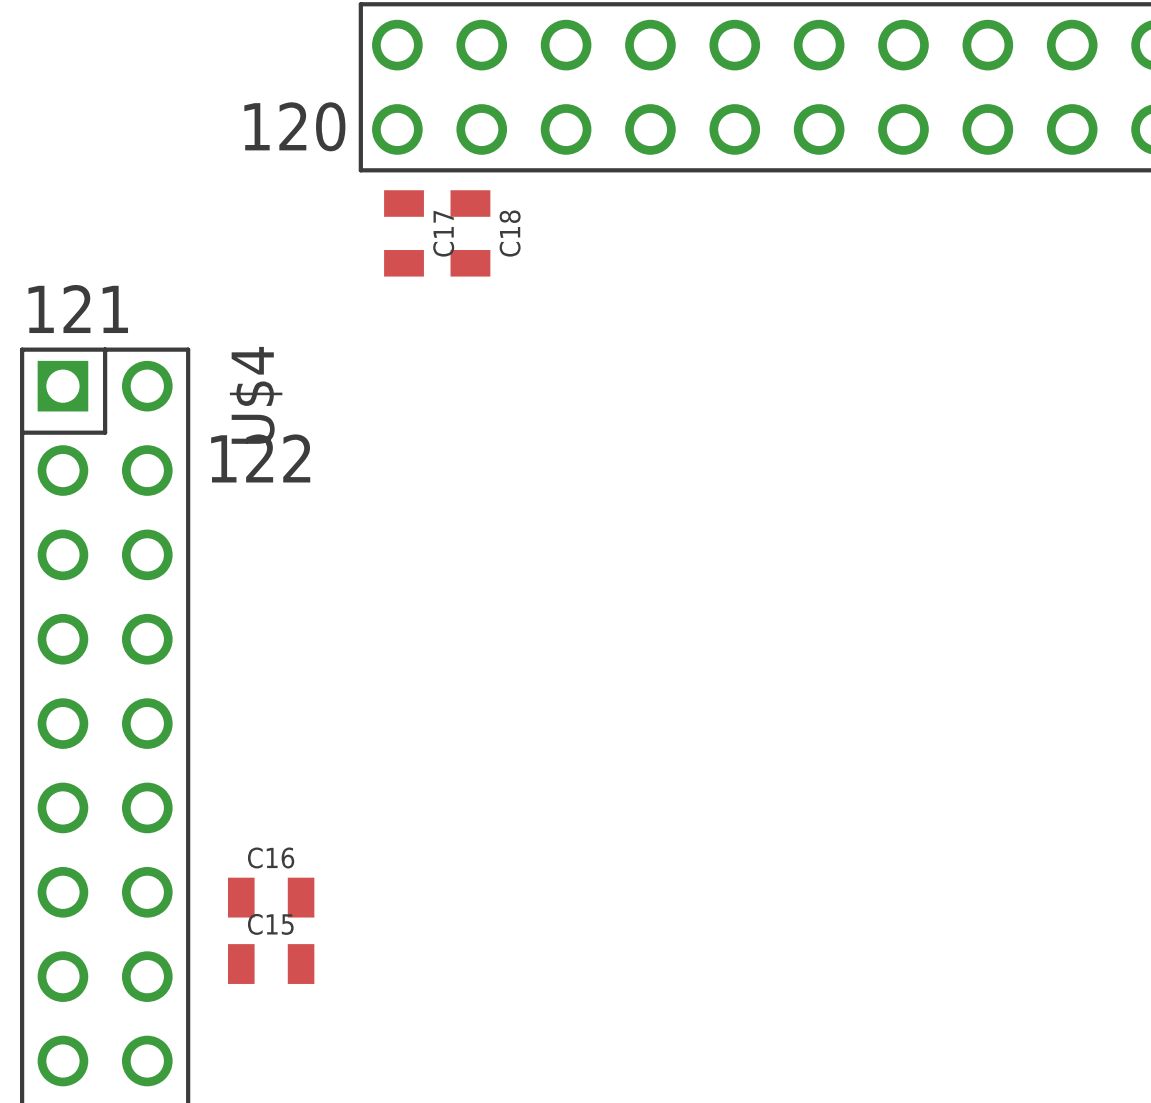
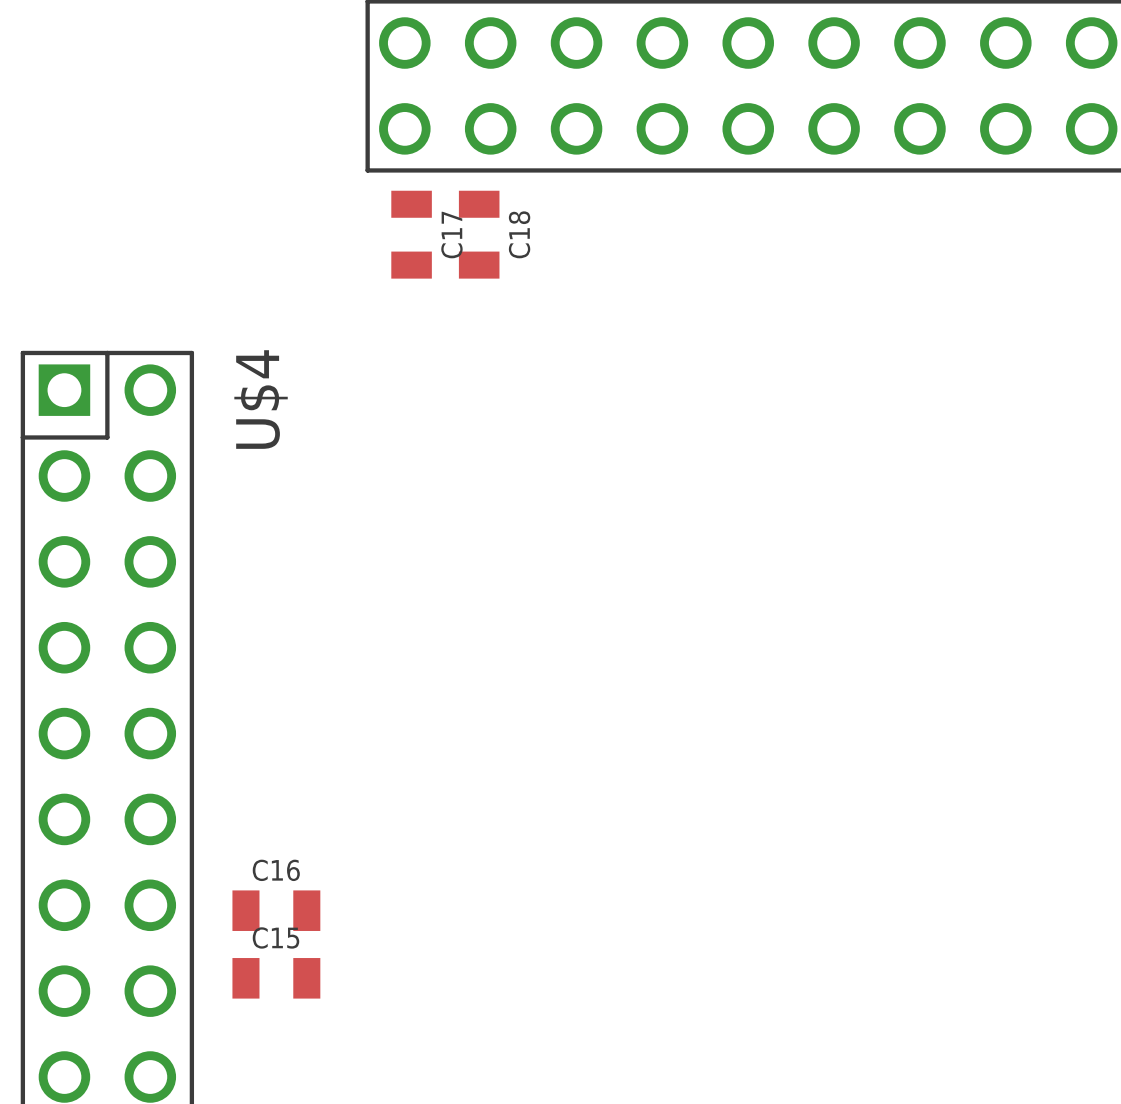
text: 120 (294, 126) -> none
text: 121 (78, 308) -> none
text: 122 (260, 458) -> none

